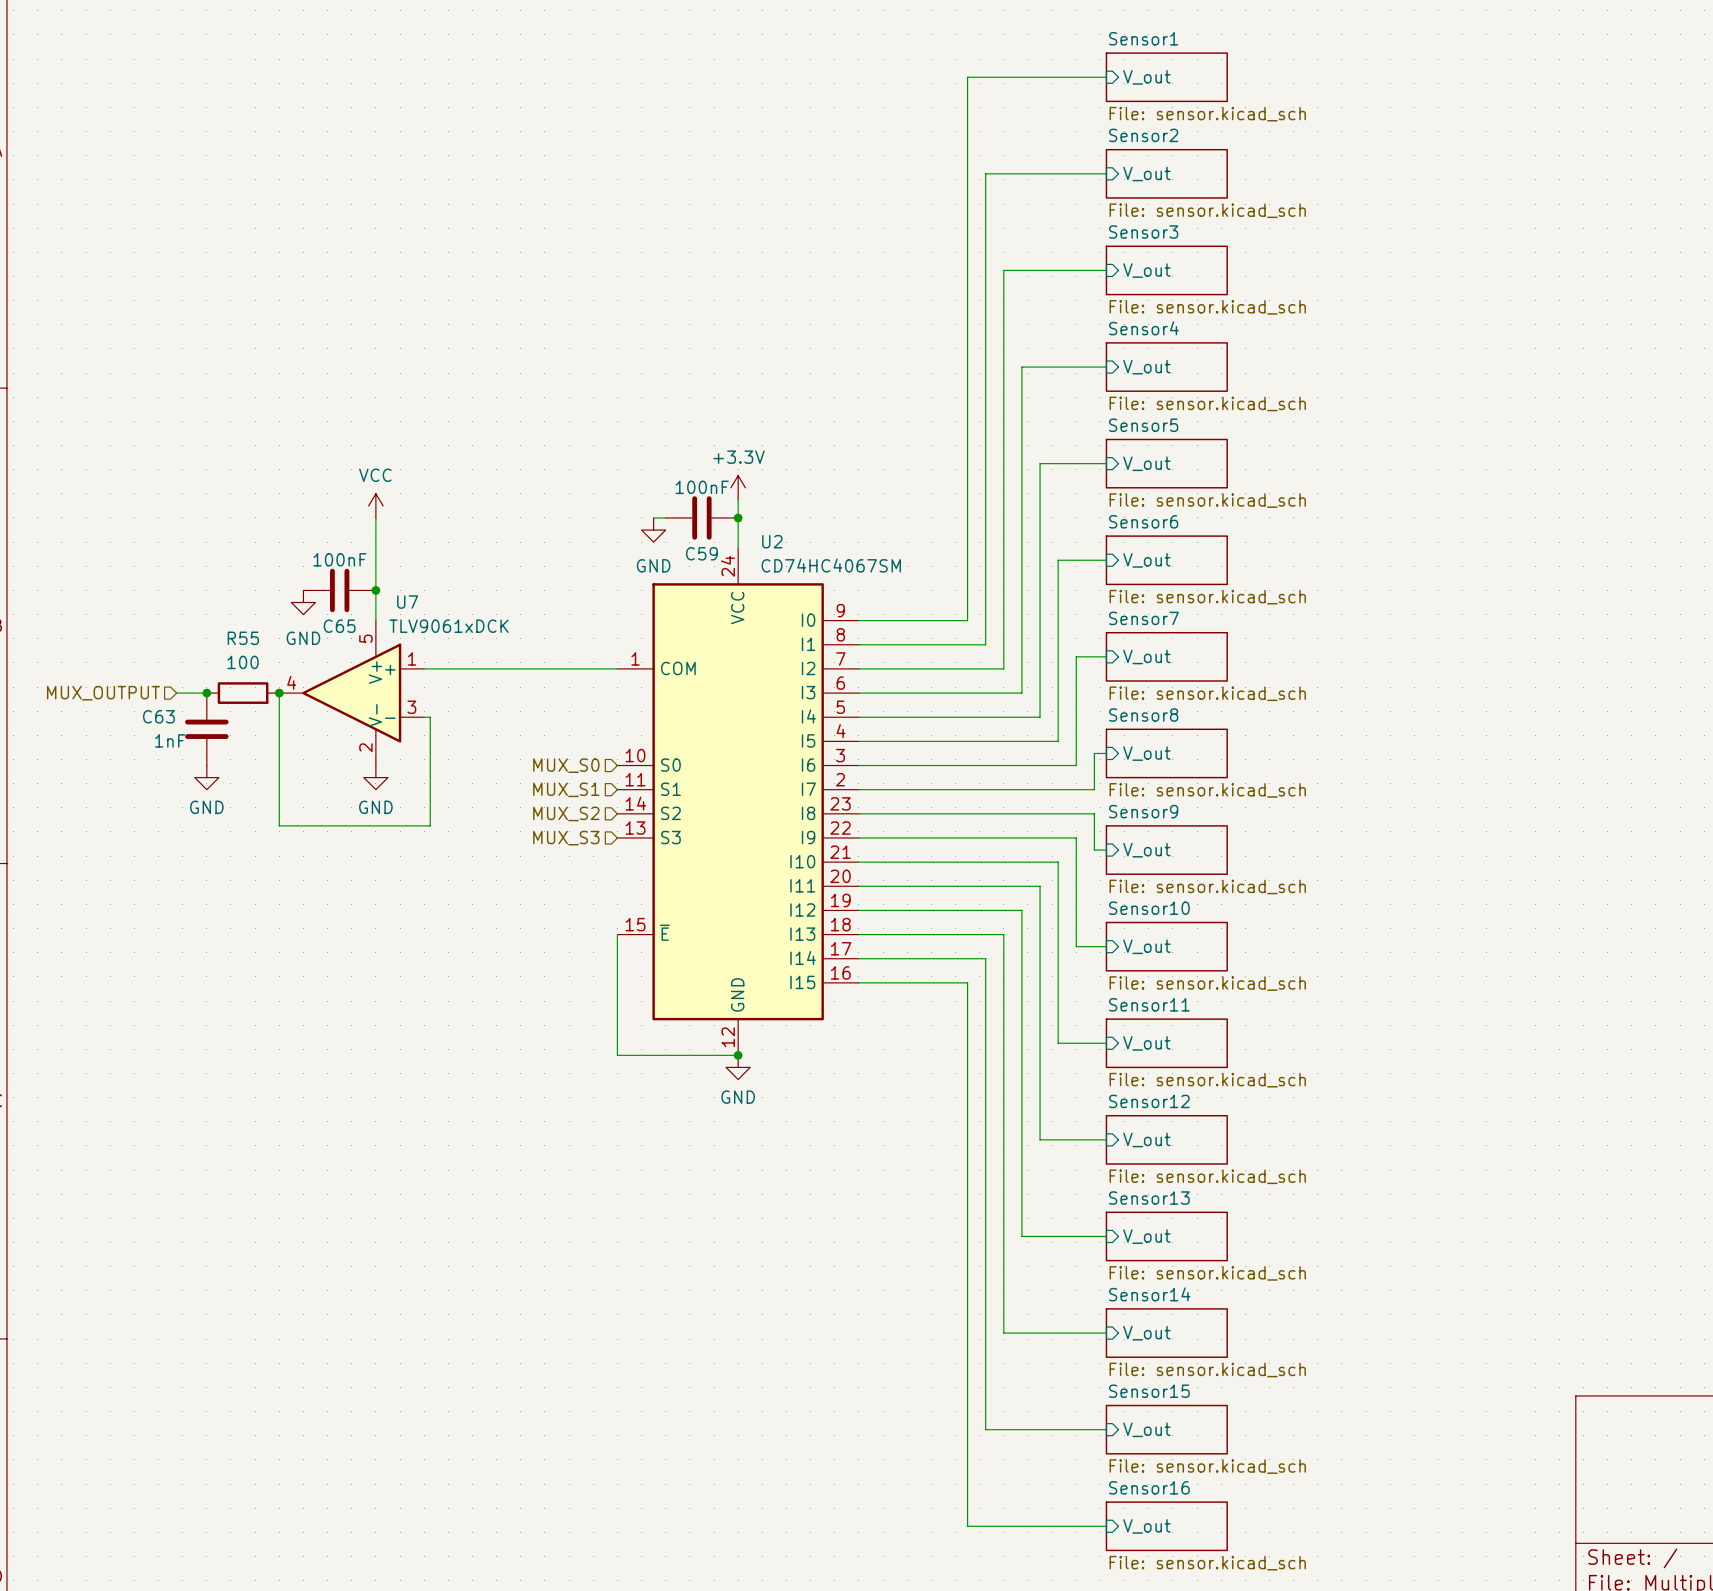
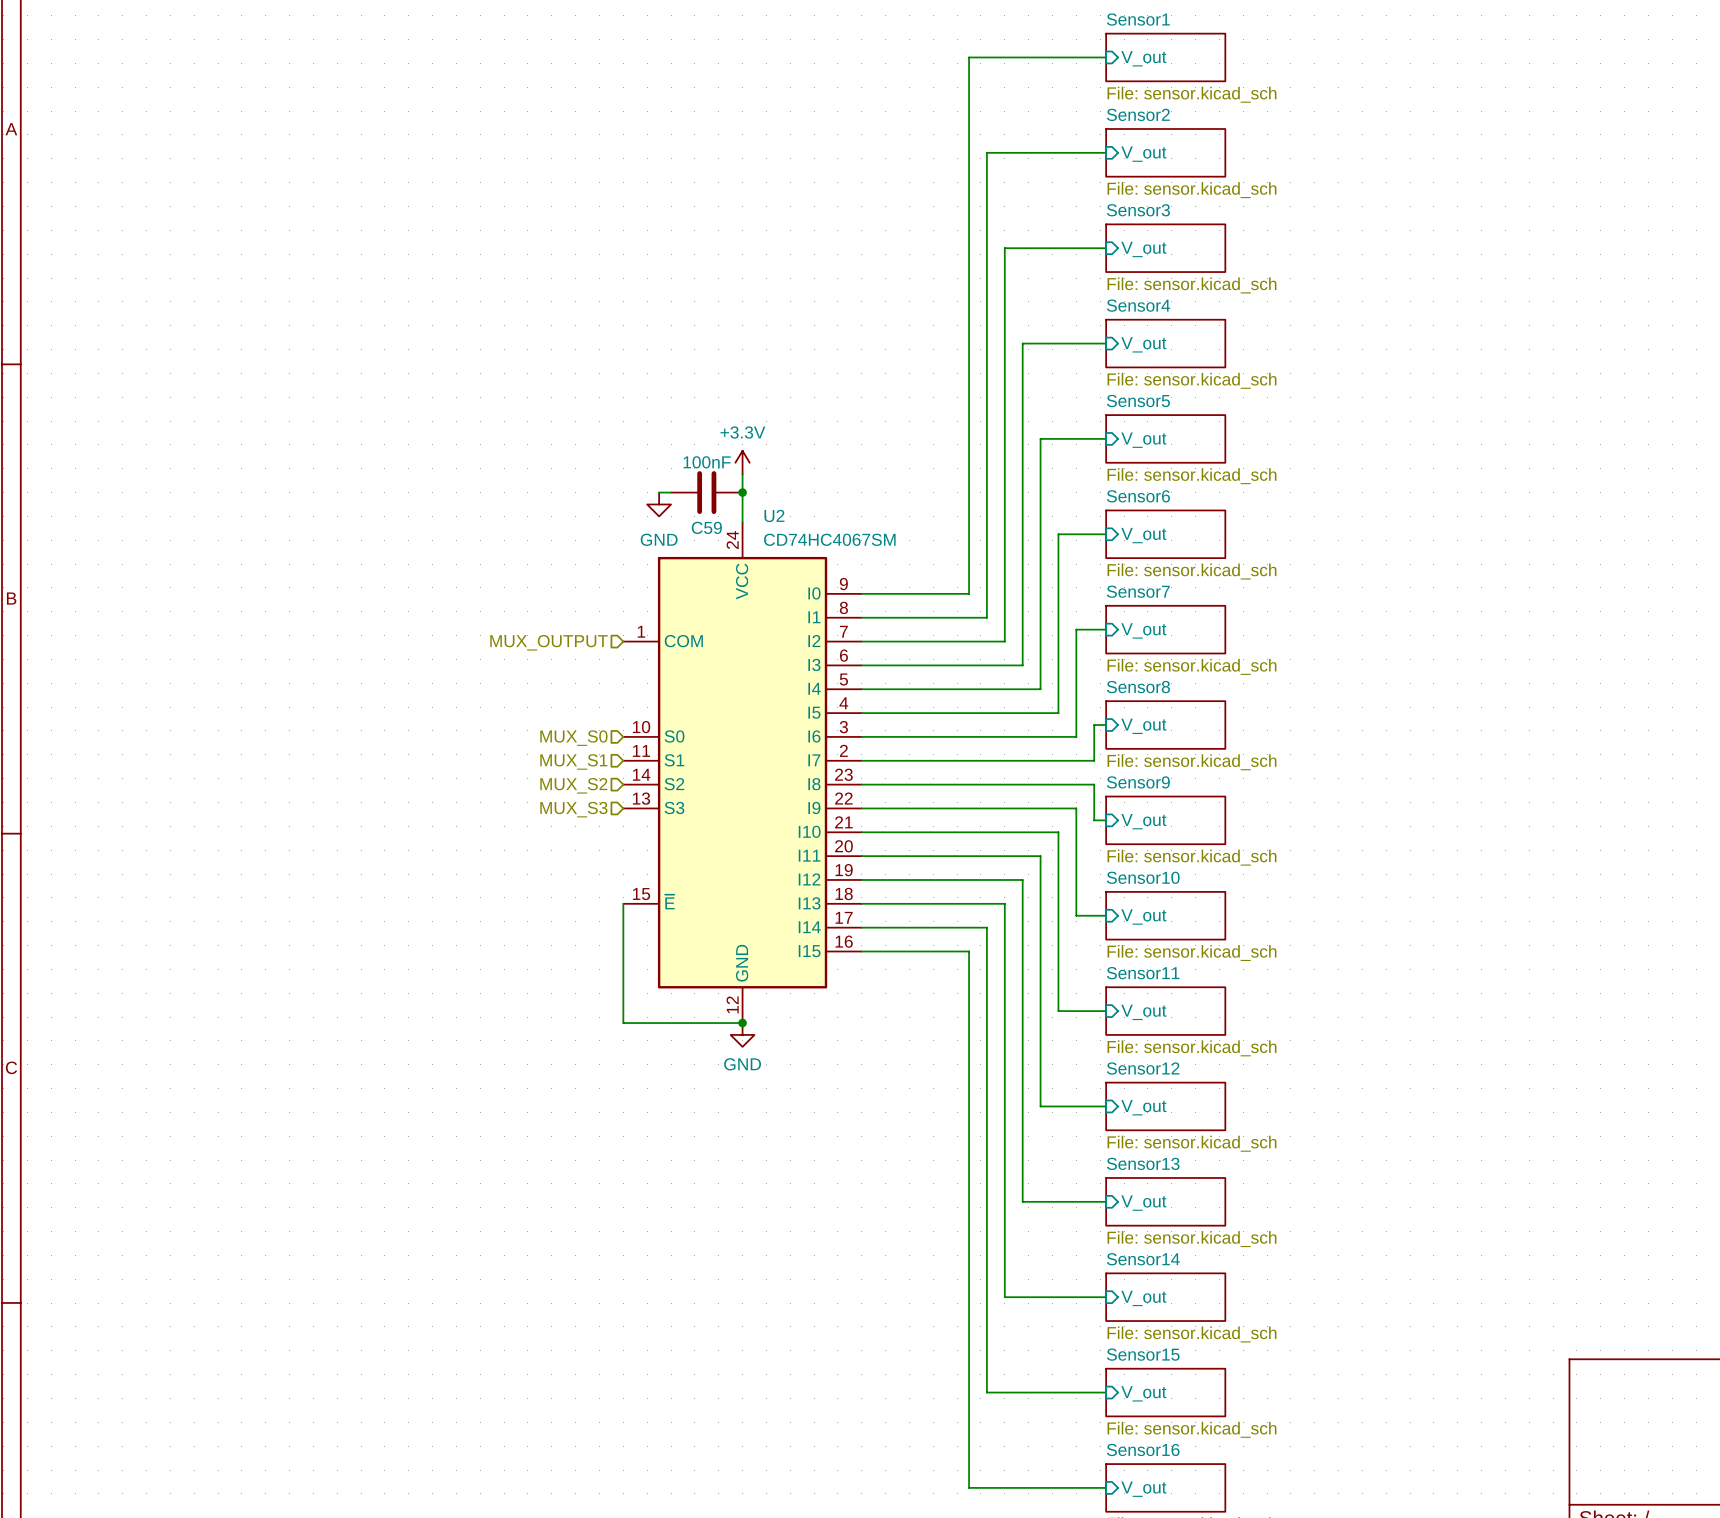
power symbol: VCC (375, 505) -> none
wire: (375, 517) (375, 620) -> none
C65: 100nF (339, 590) -> none
junction: (375, 590) -> none
power symbol: GND (303, 602) -> none
wire: (424, 668) (617, 668) -> none
hierarchical label: none -> MUX_OUTPUT (549, 642)
hierarchical label: MUX_OUTPUT (103, 693) -> none
wire: (176, 693) (206, 693) -> none
junction: (206, 693) -> none
R55: 100 (243, 693) -> none
wire: (279, 693) (279, 825) (430, 825) (430, 717) (424, 717) -> none
junction: (279, 693) -> none
U7: TLV9061xDCK (351, 693) -> none
C63: 1nF (206, 729) -> none
power symbol: GND (206, 777) -> none
power symbol: GND (375, 777) -> none

